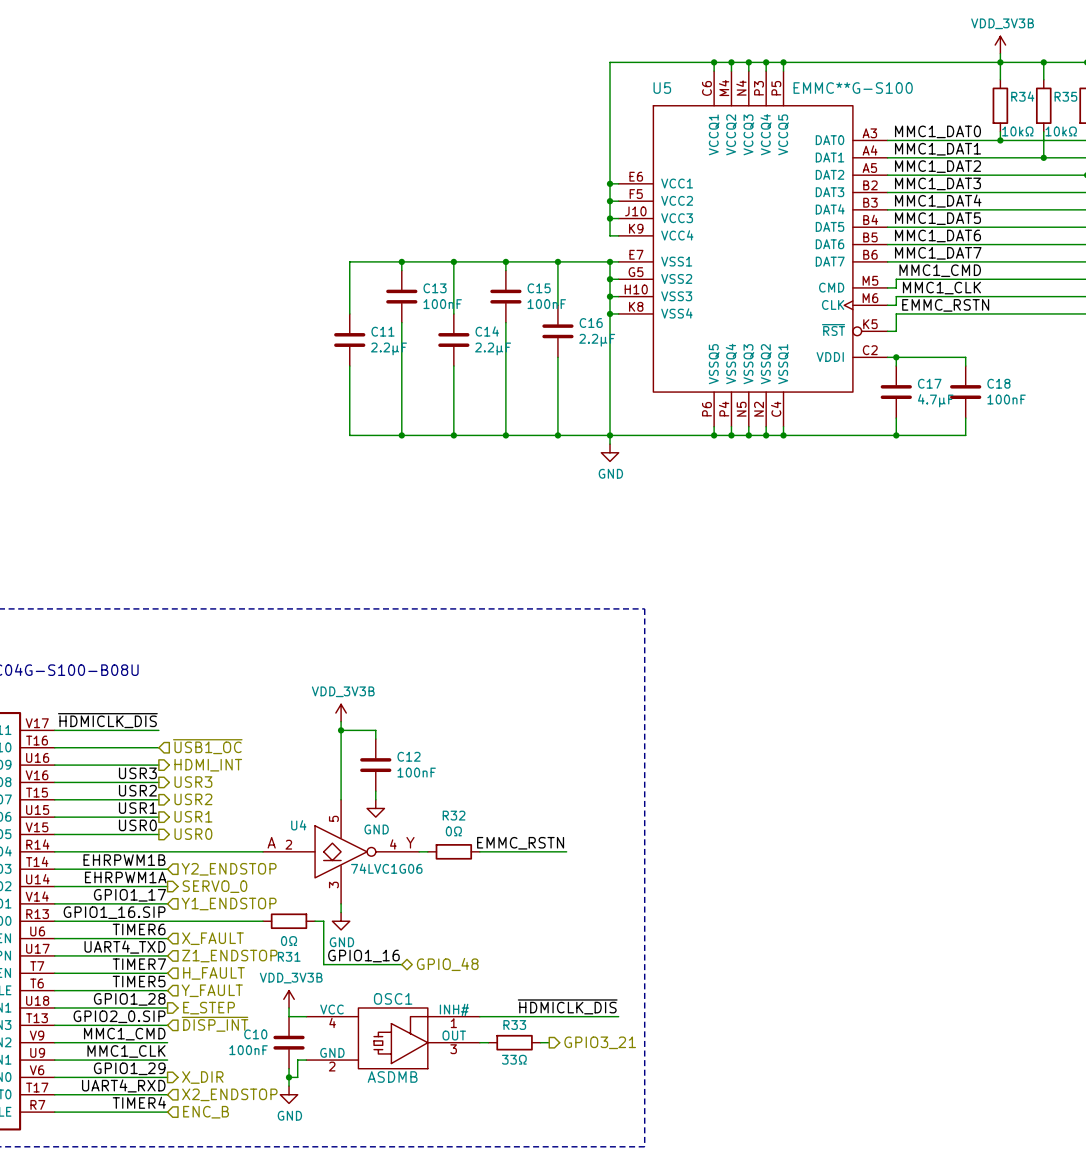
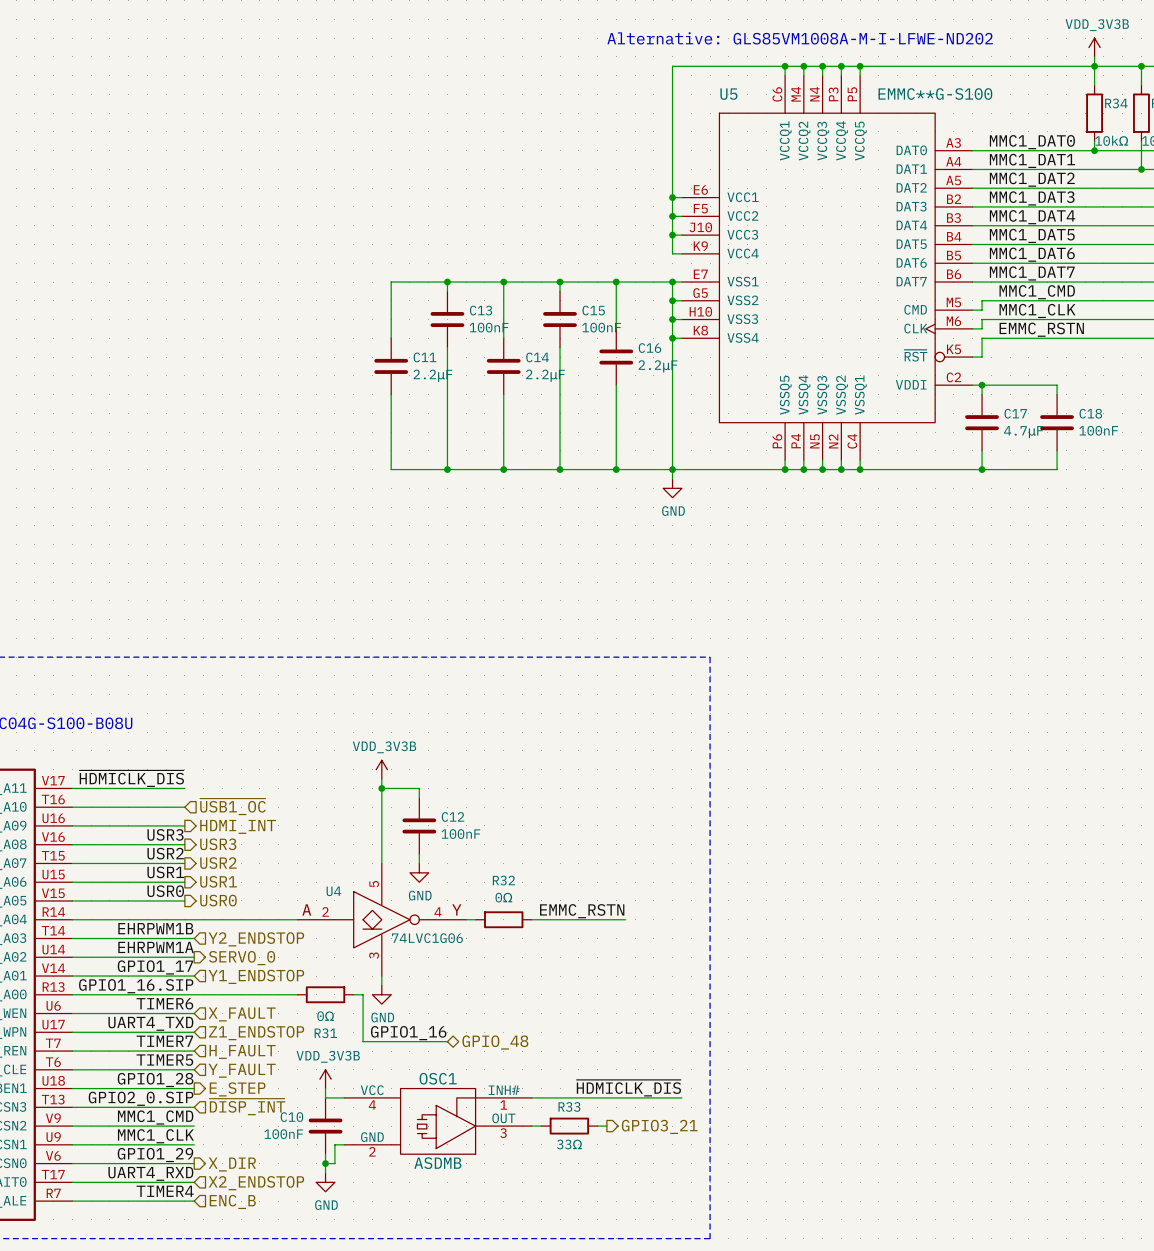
text: none -> Alternative: GLS85VM1008A-M-I-LFWE-ND202 (800, 38)

